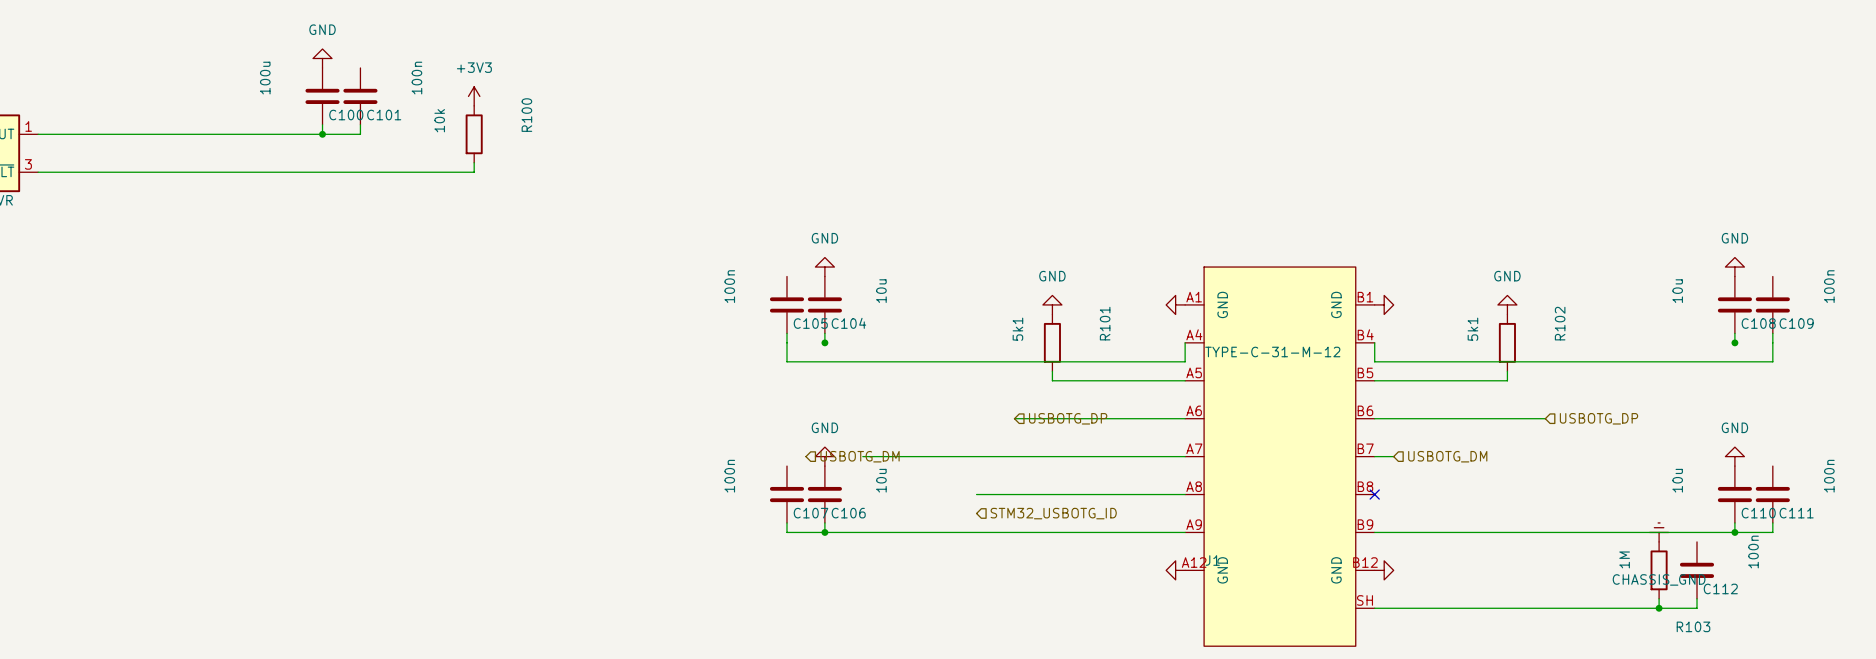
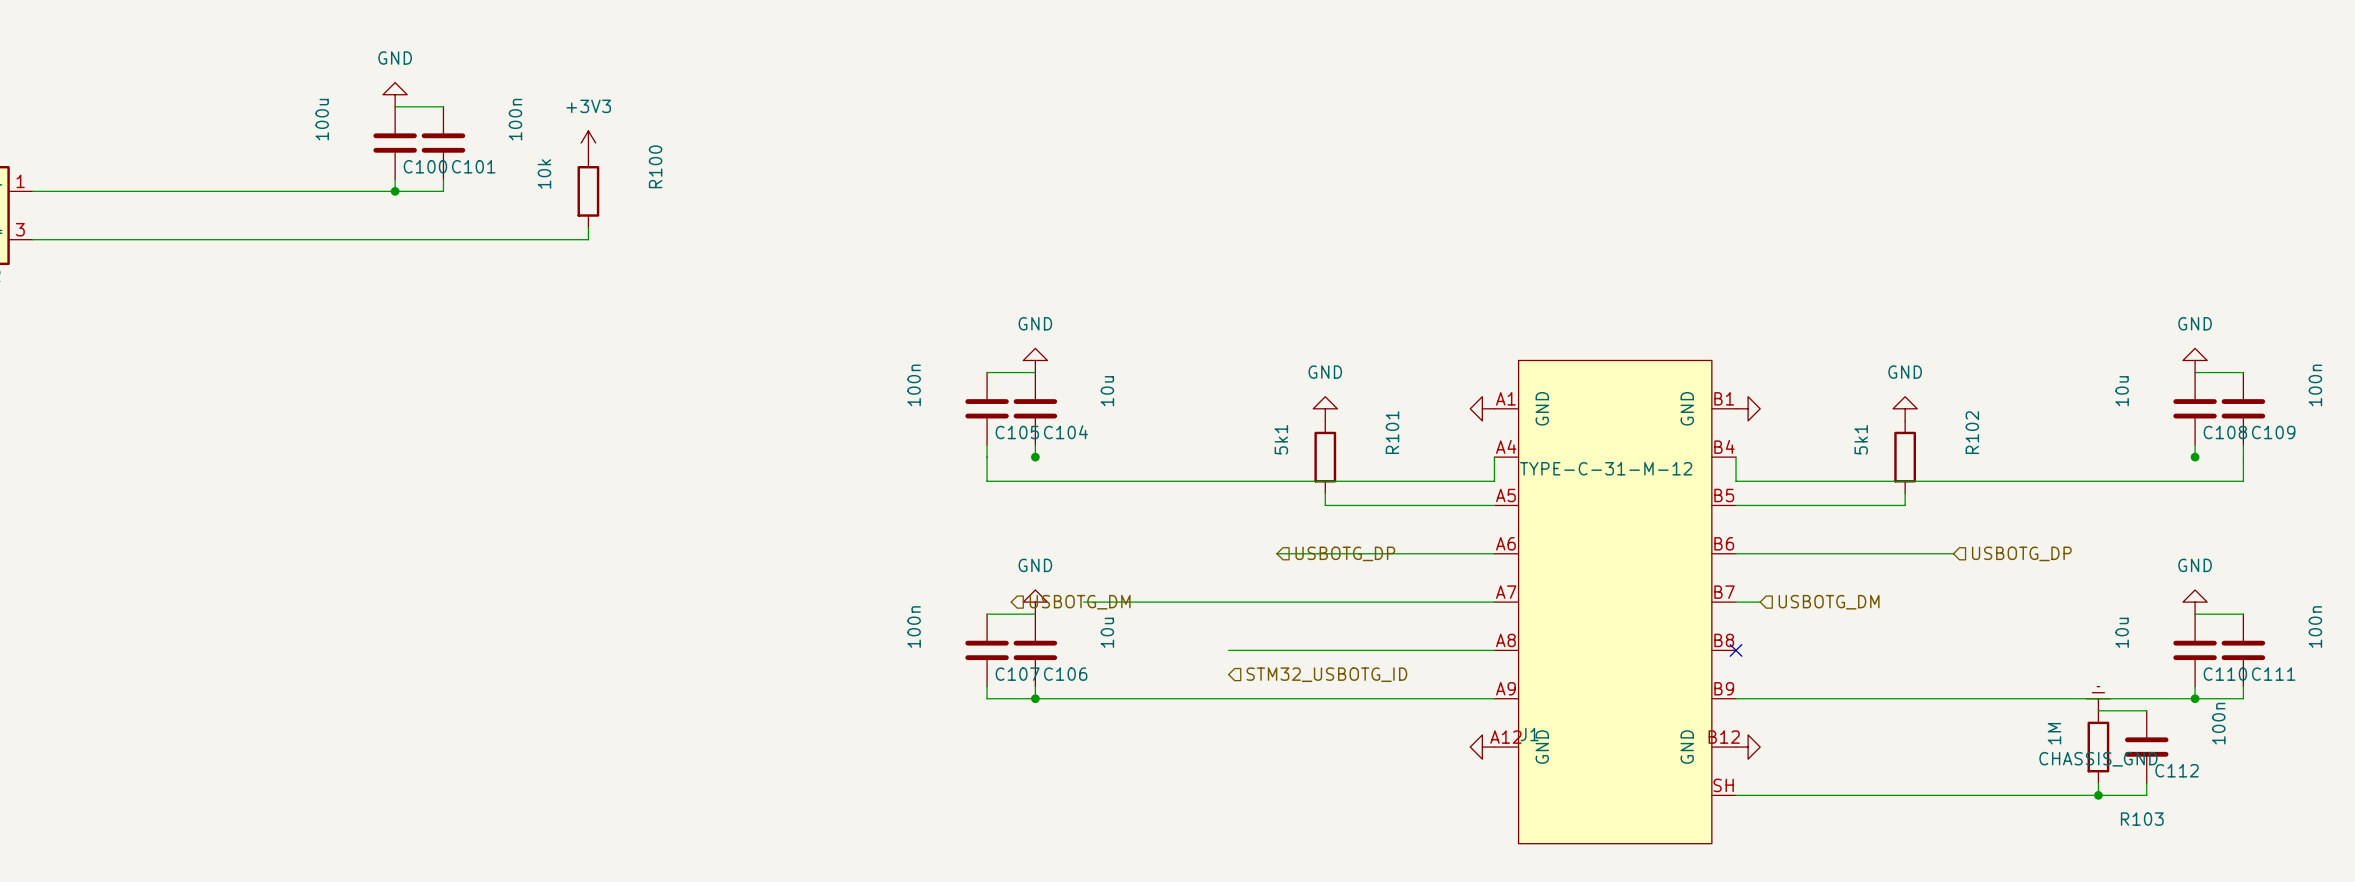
wire: none -> (395, 106) (443, 106)
wire: none -> (987, 372) (1035, 372)
wire: none -> (2195, 372) (2243, 372)
wire: none -> (987, 614) (1035, 614)
wire: none -> (2195, 614) (2243, 614)
wire: none -> (2098, 710) (2146, 710)

